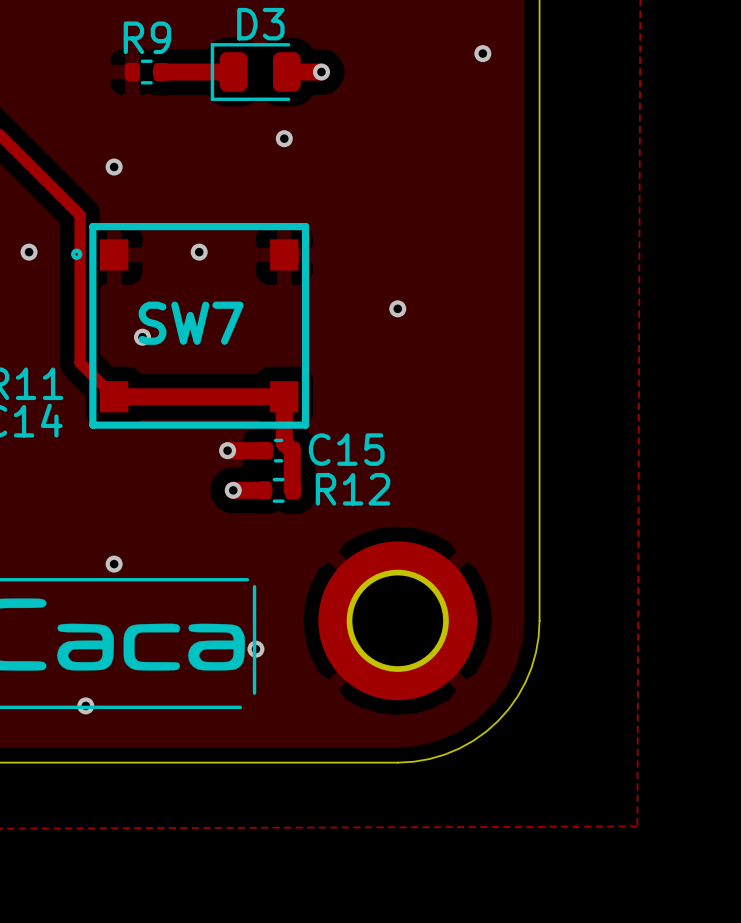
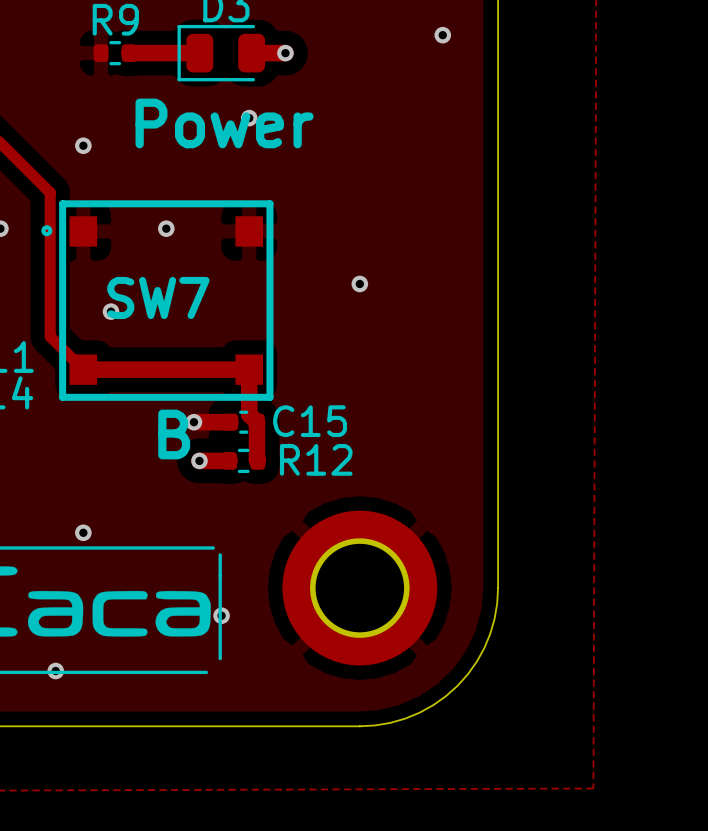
text: none -> Power (224, 123)
text: none -> B (174, 434)

